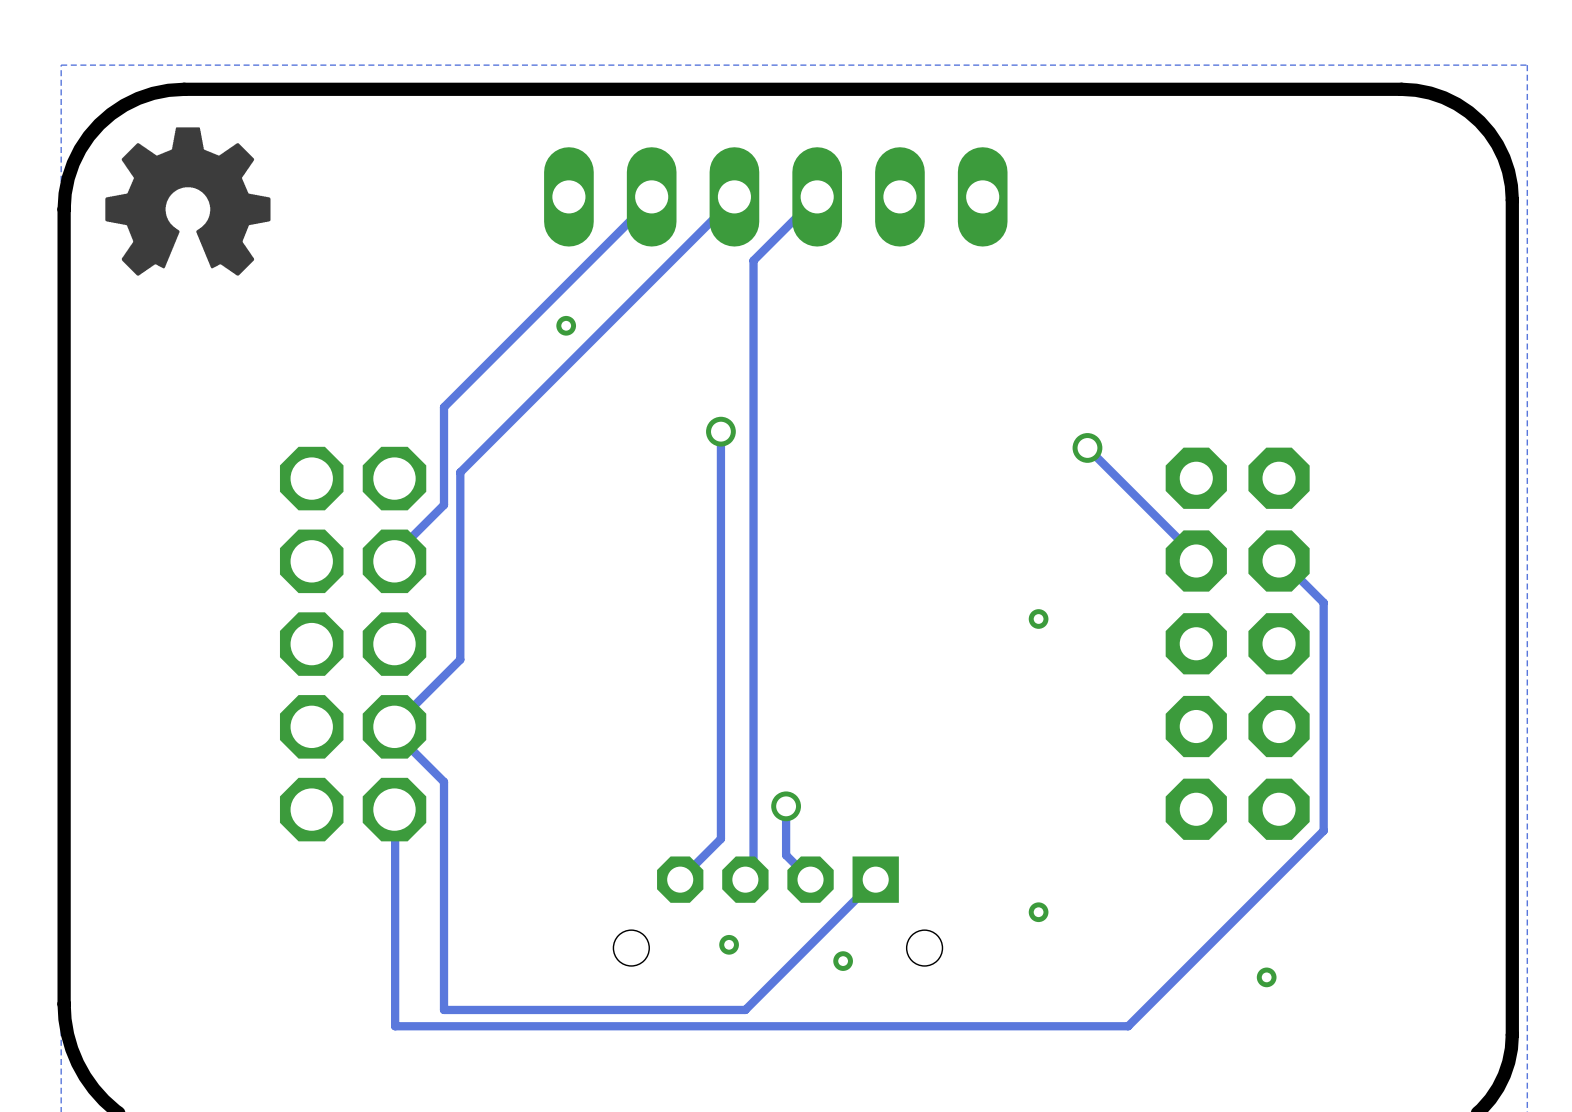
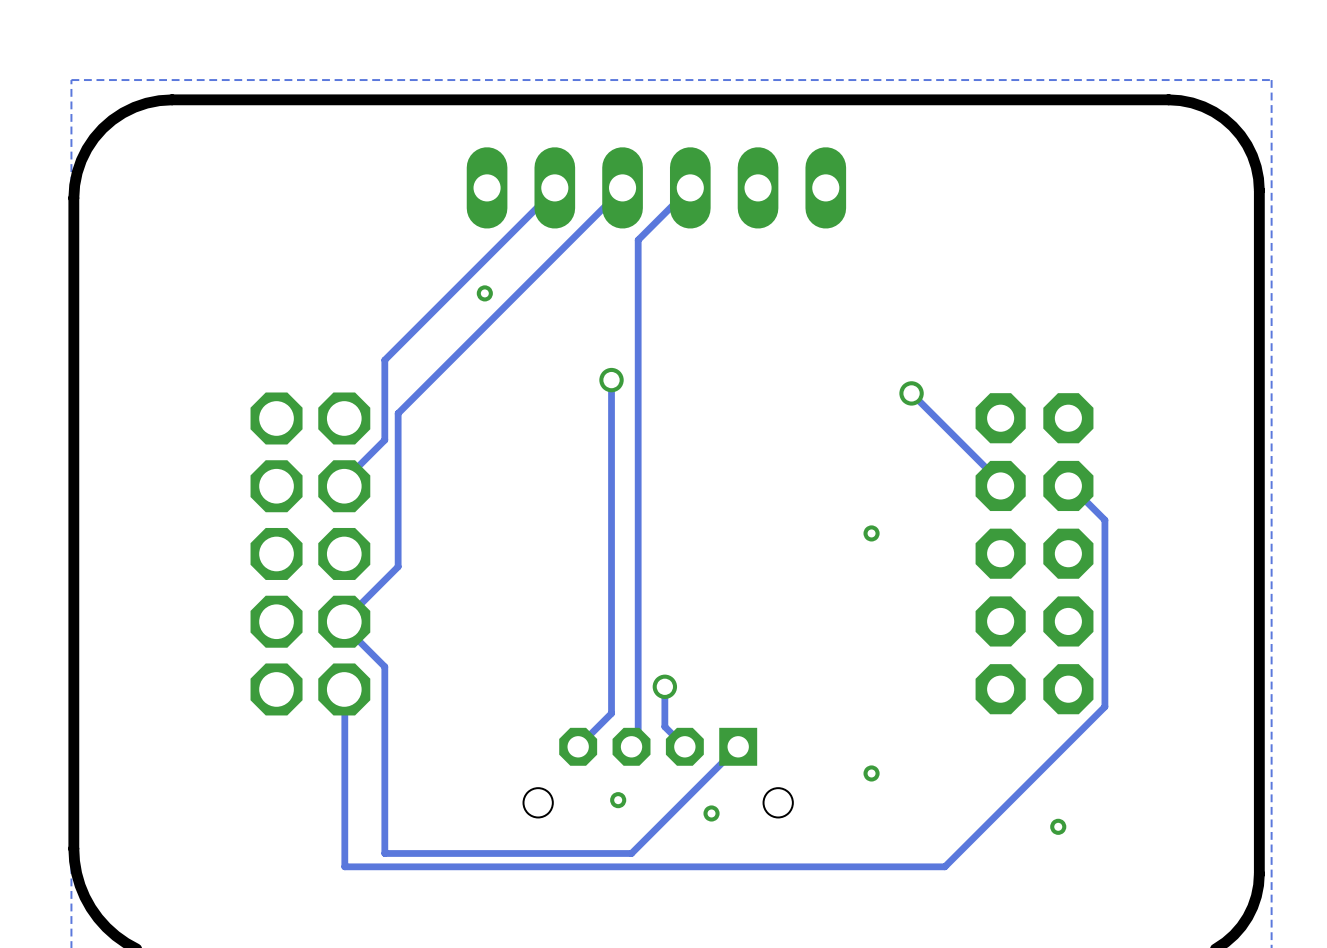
drawing: [105, 127, 271, 276] -> none

